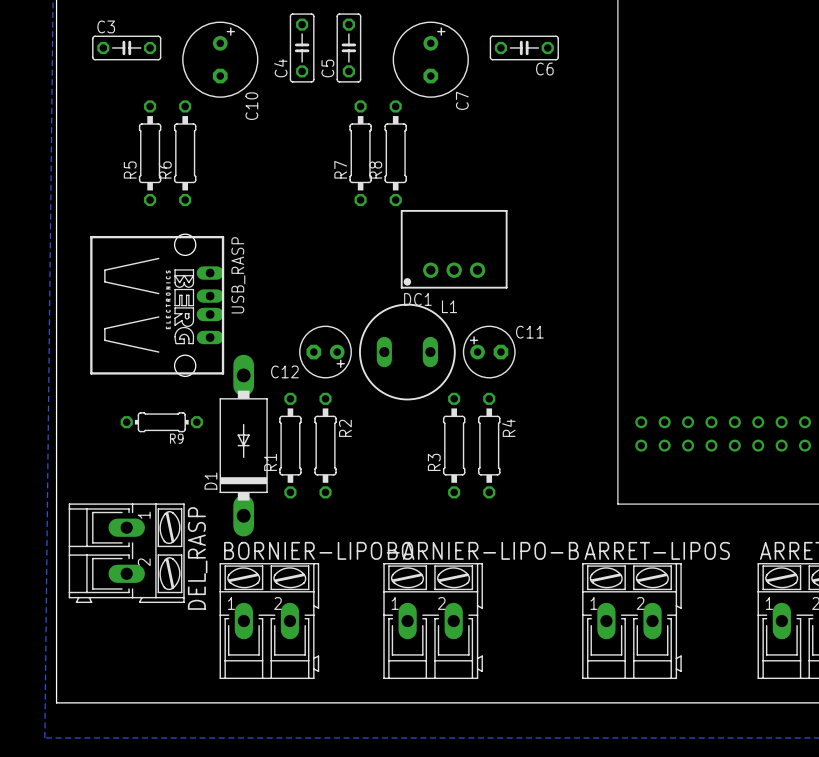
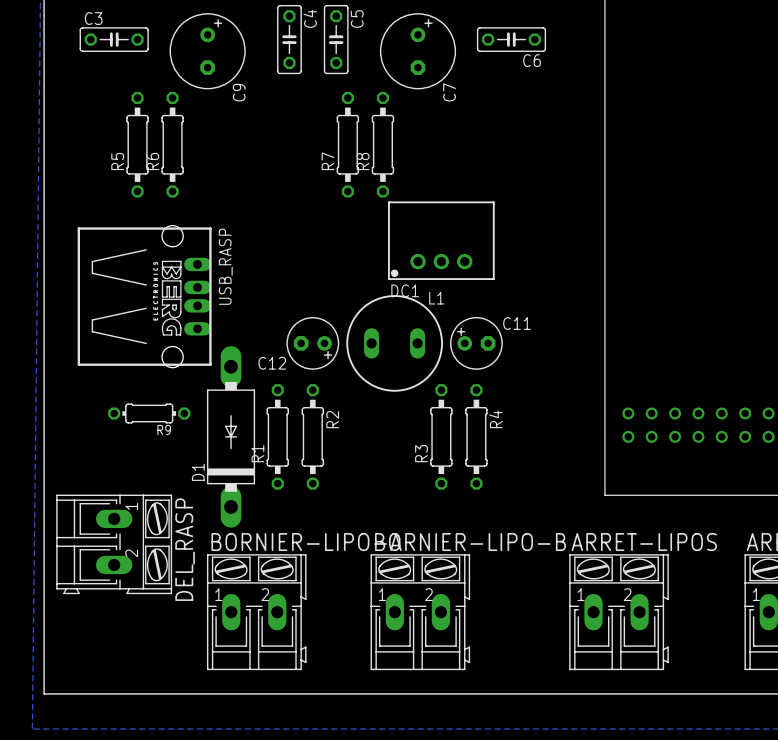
C4 rotation: 0° (302, 47) -> 180° (289, 39)
C5 rotation: 0° (348, 47) -> 180° (336, 39)
C10 name: C10 (251, 106) -> C9 (239, 92)

